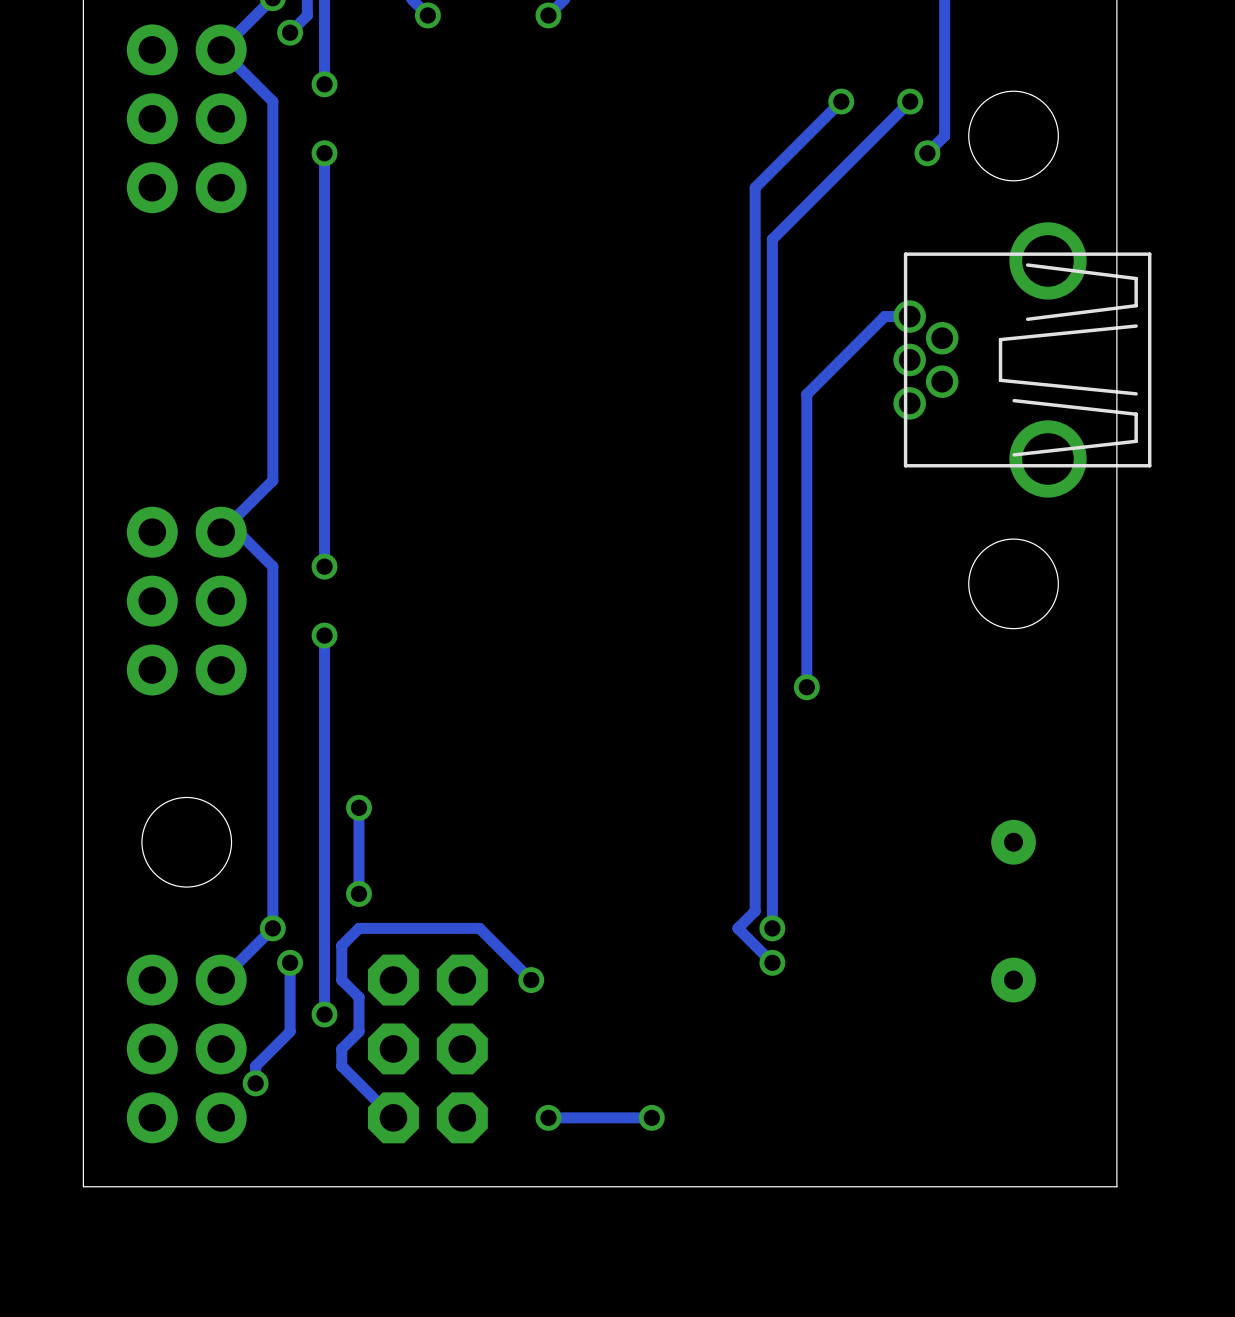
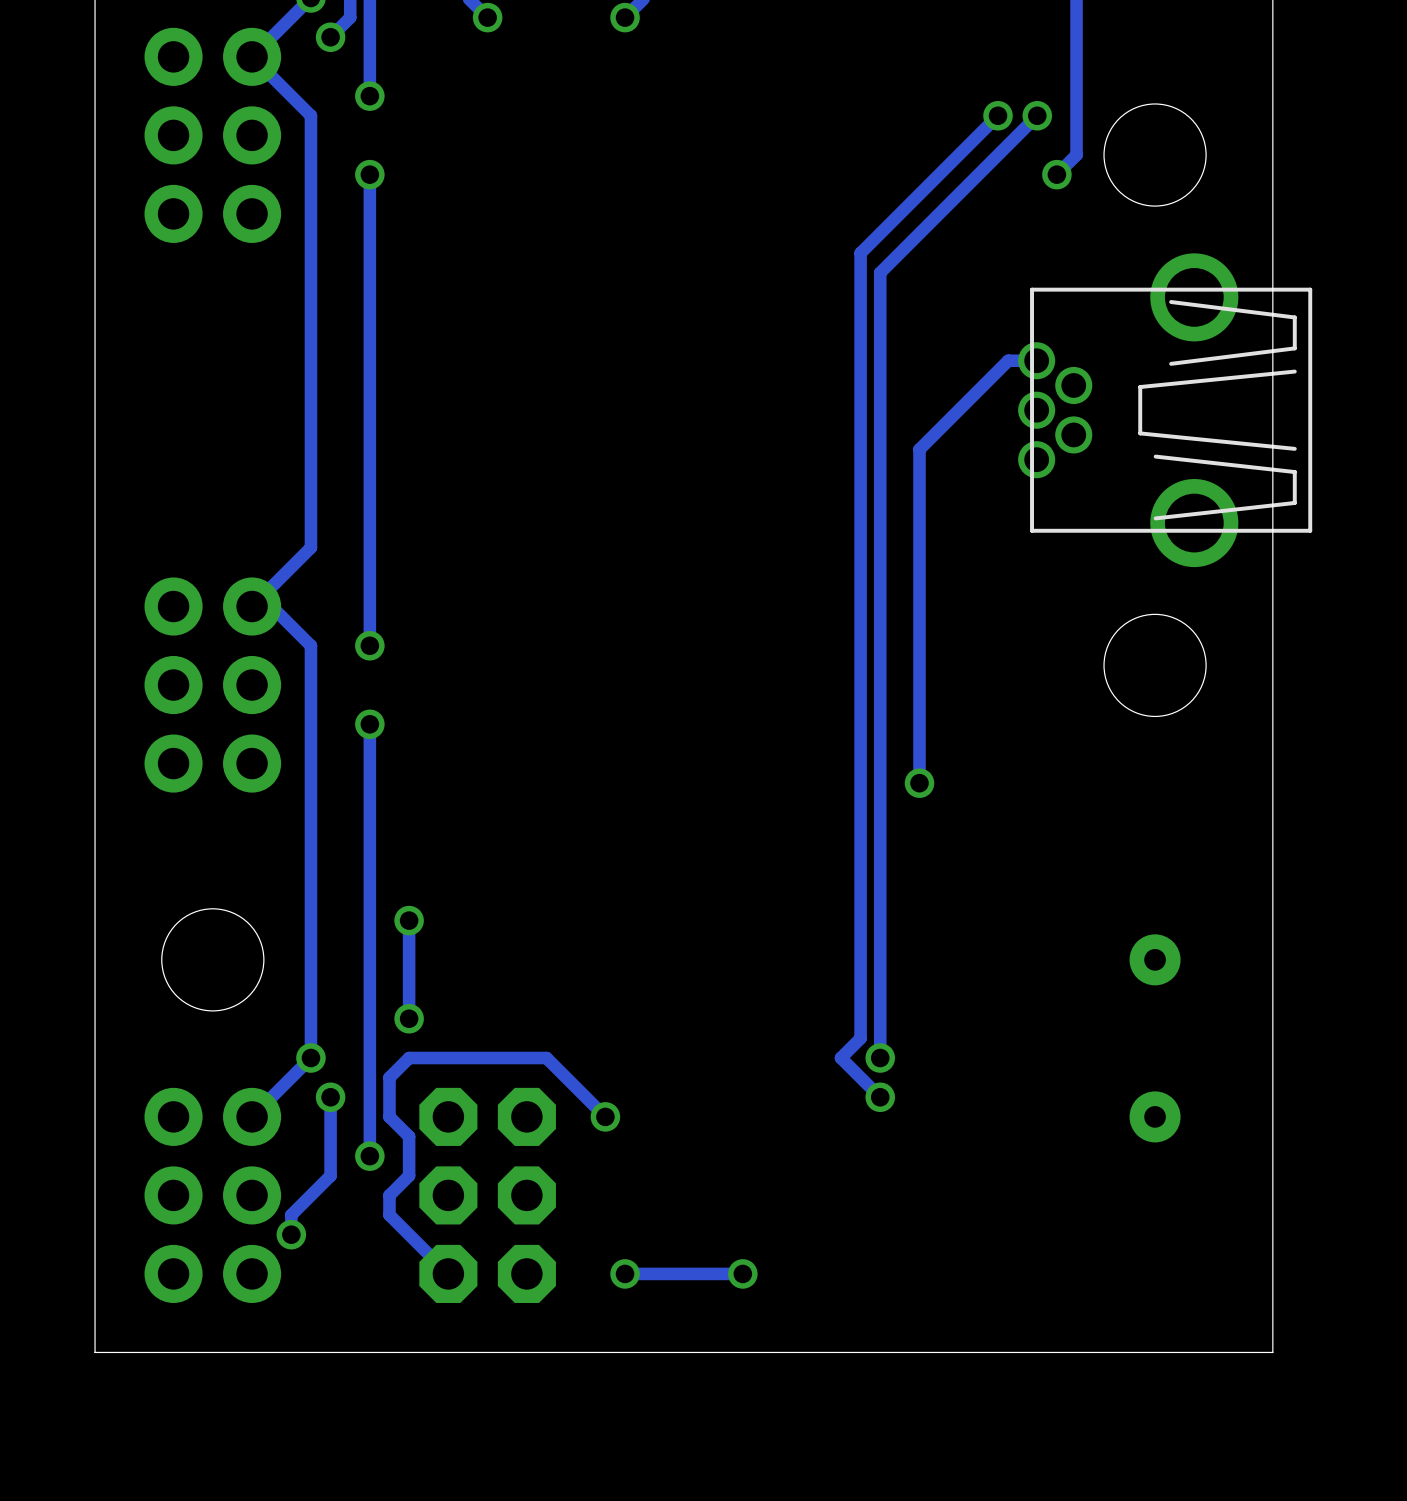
track: (841, 101) (755, 187) (755, 222) -> (998, 115) (860, 253)
via position: (841, 101) -> (998, 115)

